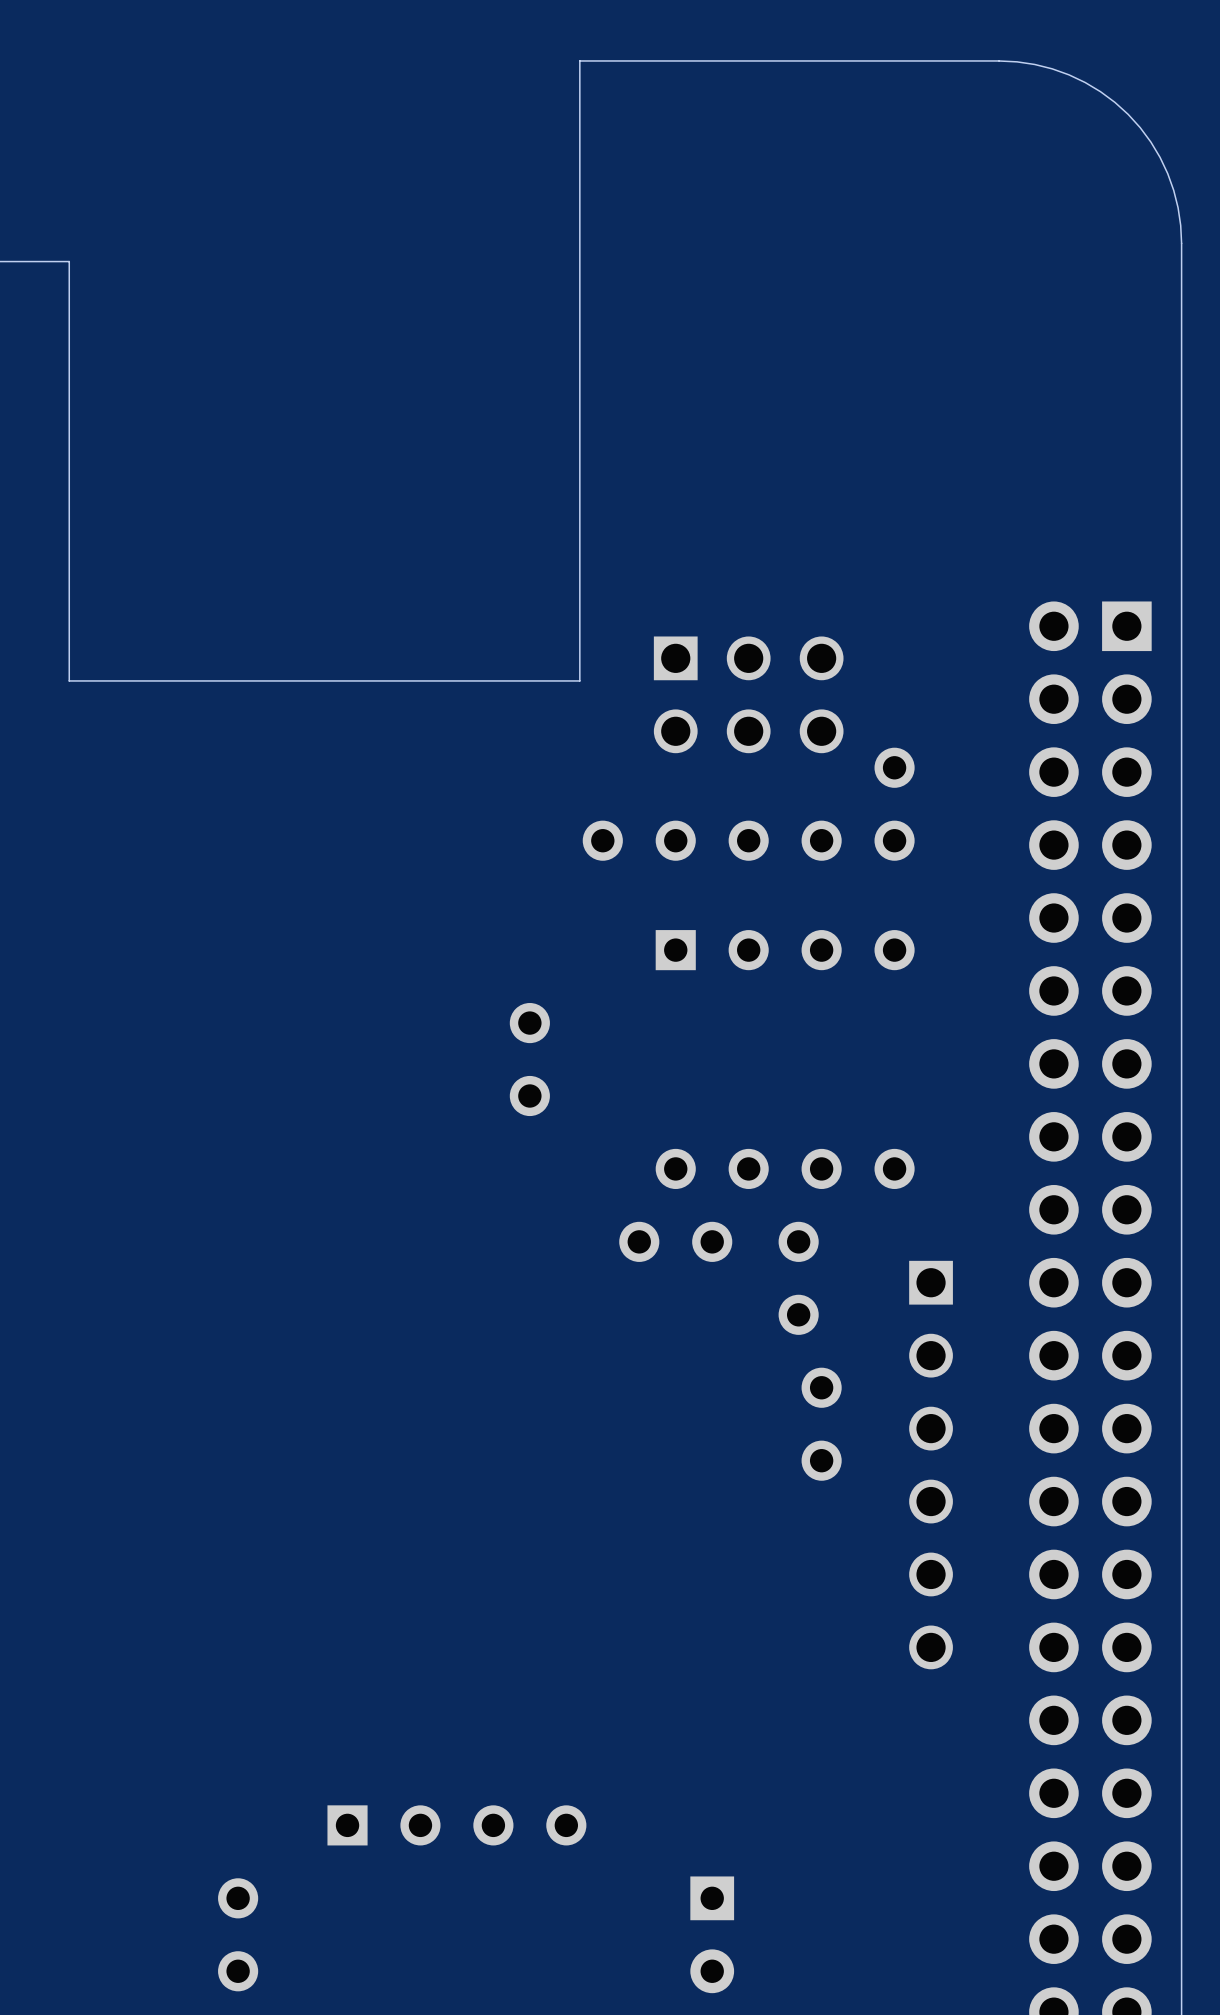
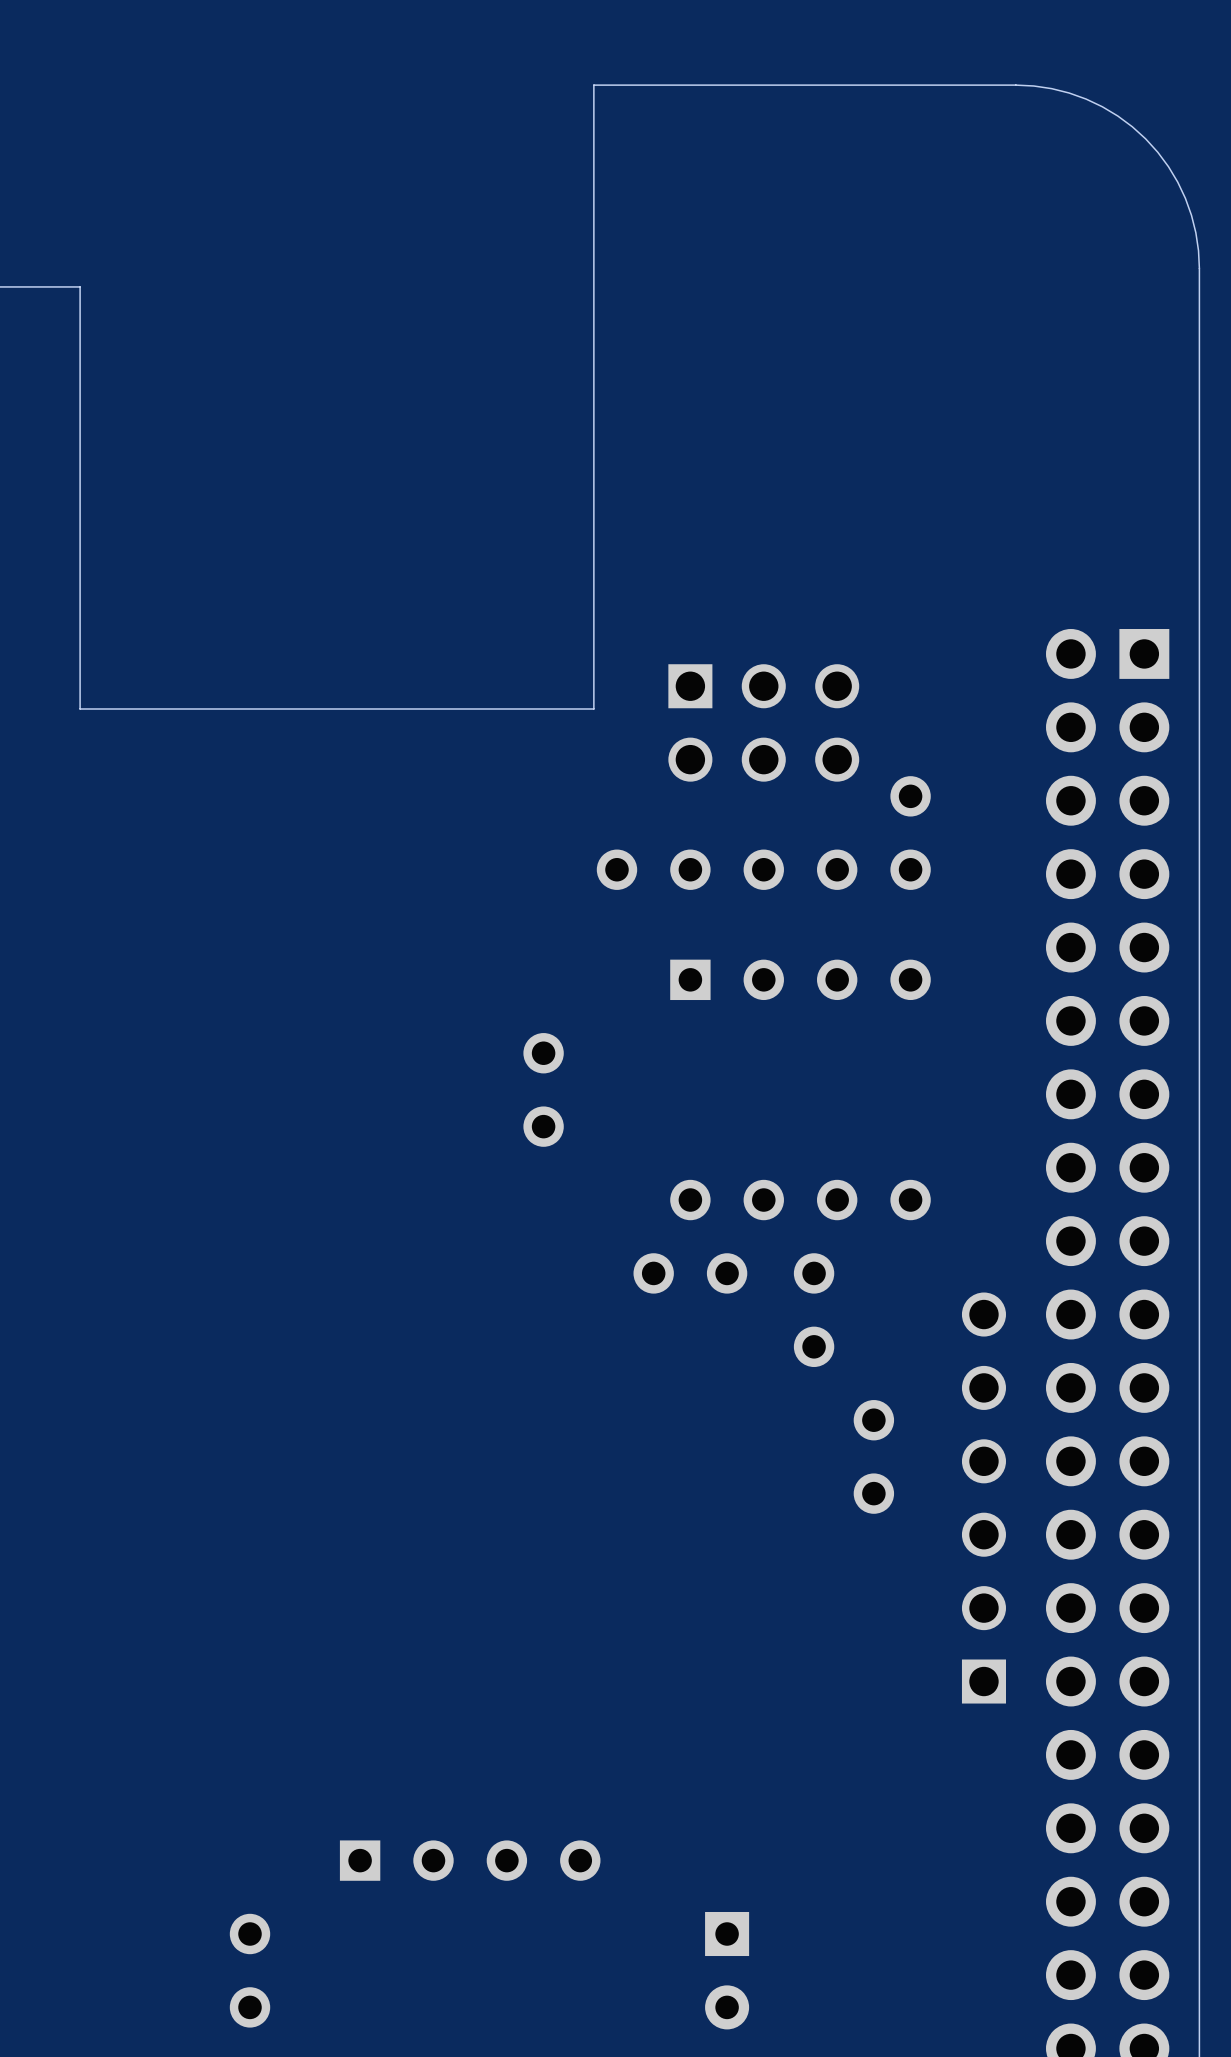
part position: (821, 1424) -> (873, 1456)
part rotation: 0° (931, 1465) -> 180° (983, 1498)

